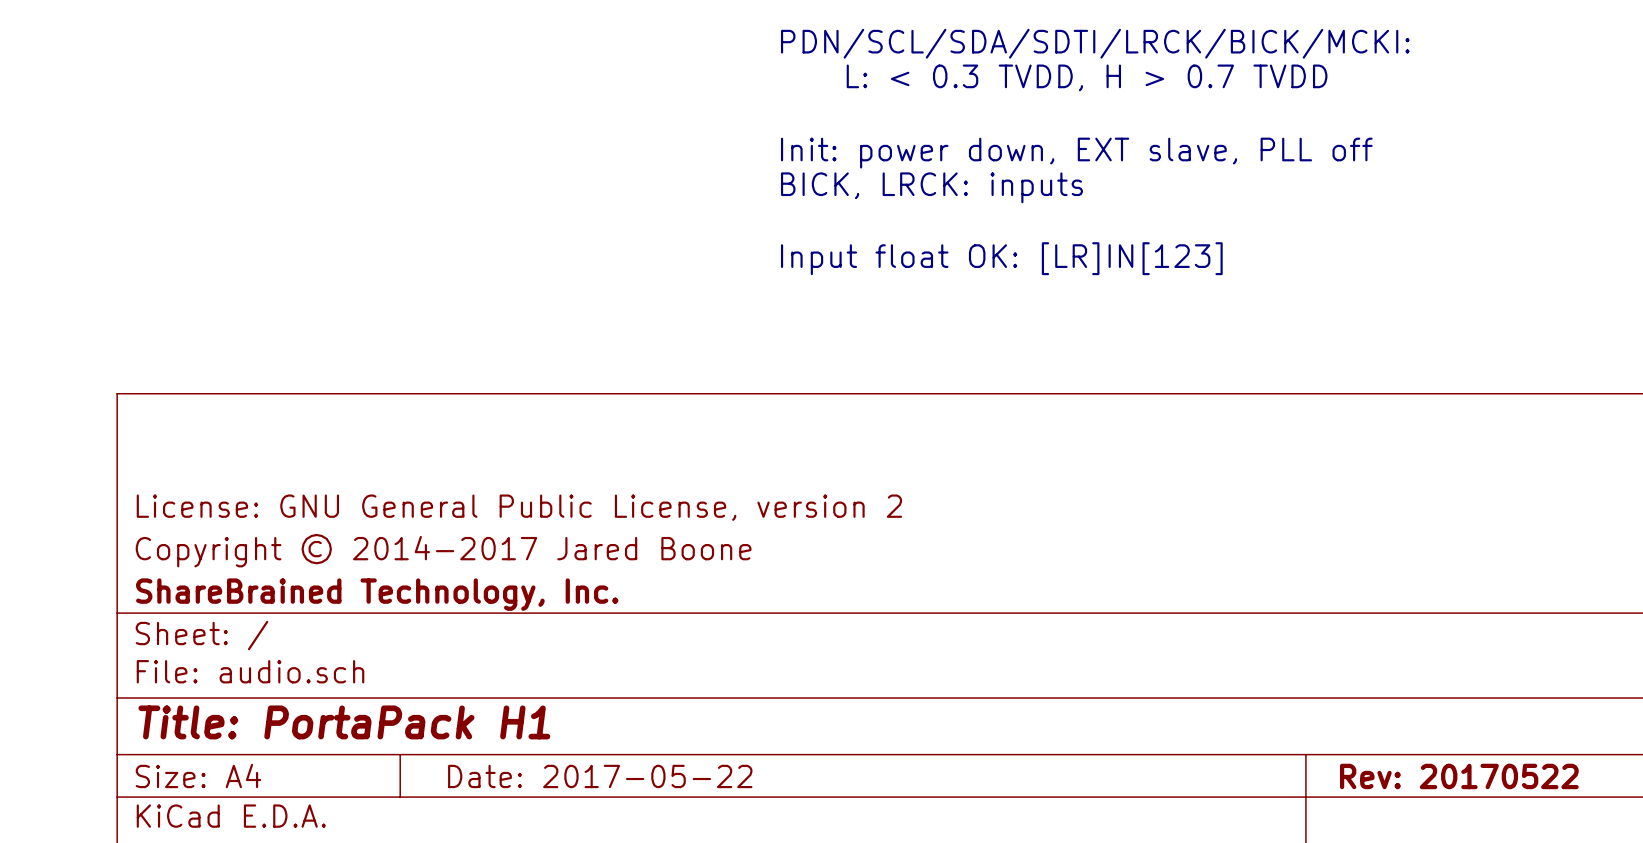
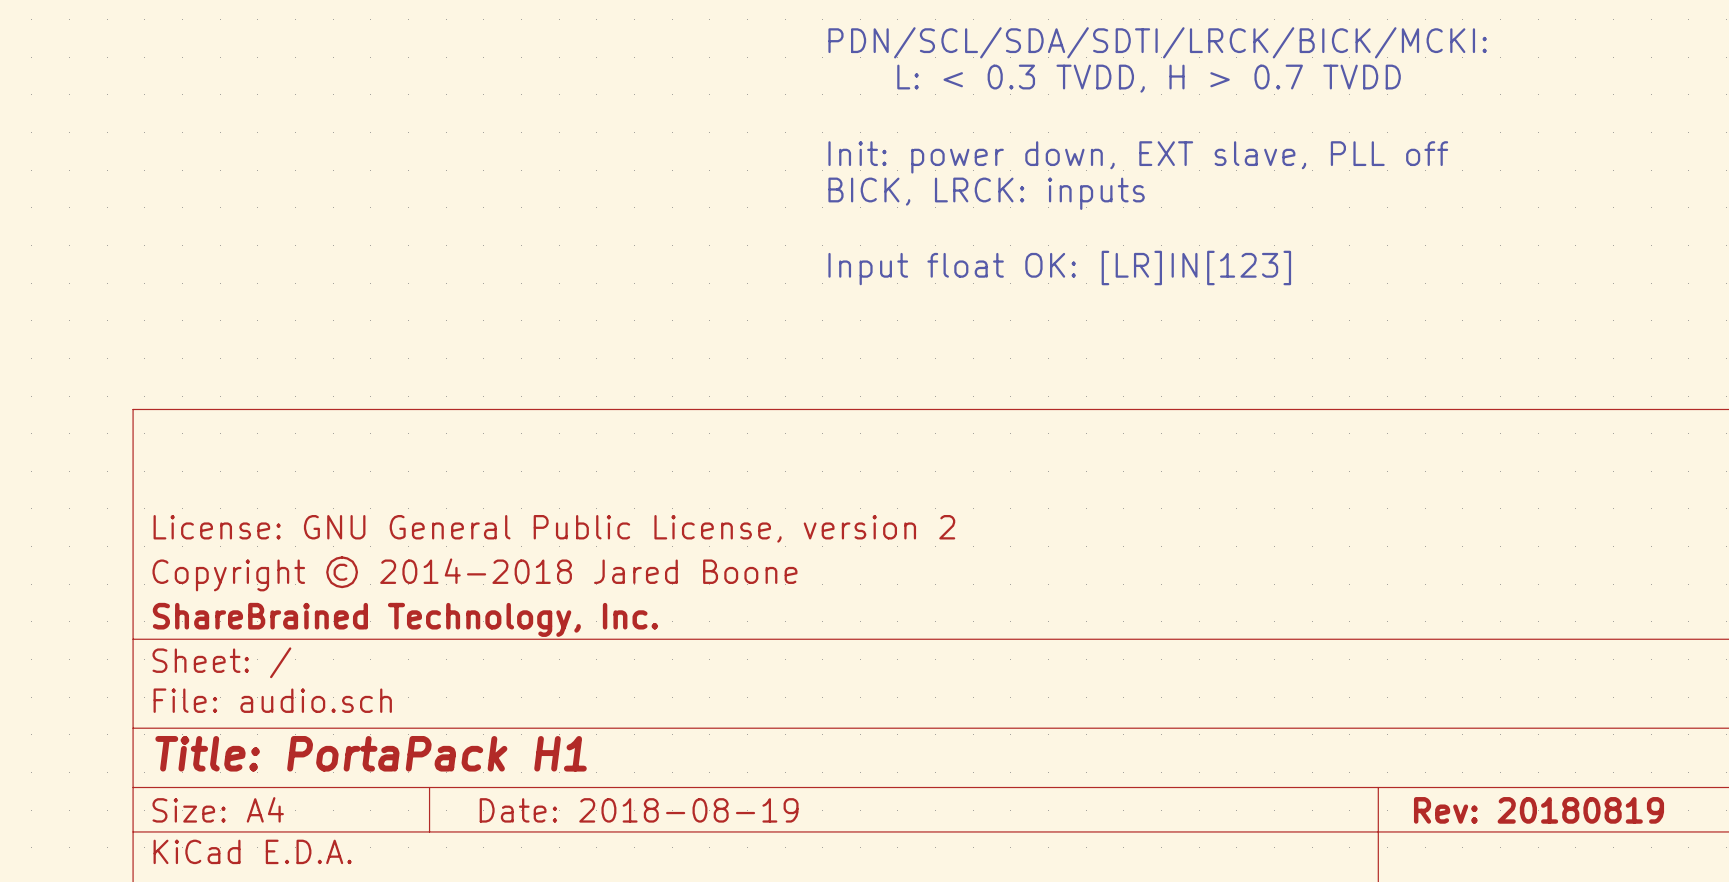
title block: Copyright © 2014-2017 Jared Boone (443, 550) -> Copyright © 2014-2018 Jared Boone (474, 573)
title block: Date: 2017-05-22 (600, 776) -> Date: 2018-08-19 (639, 810)
title block: Rev: 20170522 (1459, 776) -> Rev: 20180819 (1539, 810)

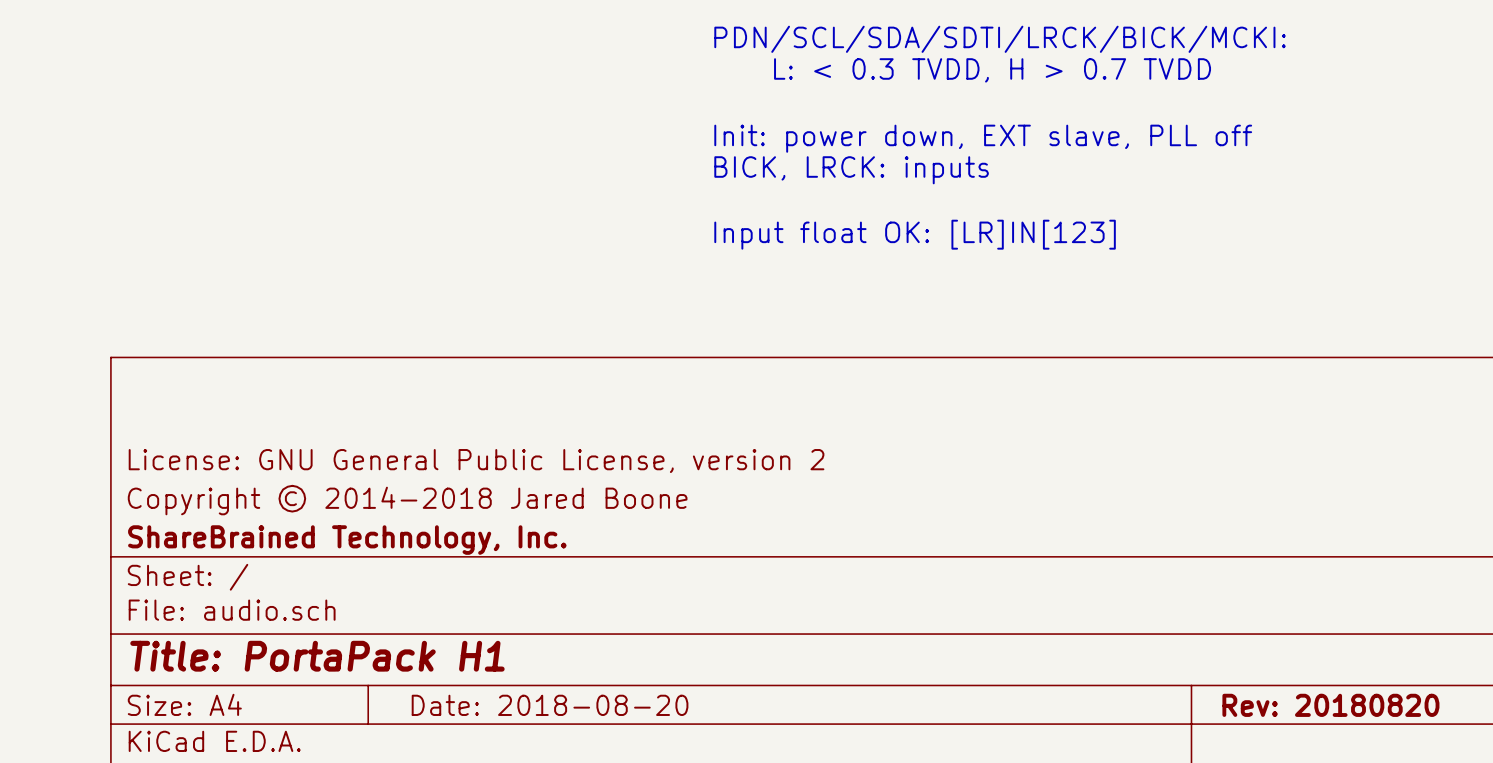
title block: Date: 2018-08-19 (639, 810) -> Date: 2018-08-20 (550, 705)
title block: Rev: 20180819 (1539, 810) -> Rev: 20180820 (1330, 705)

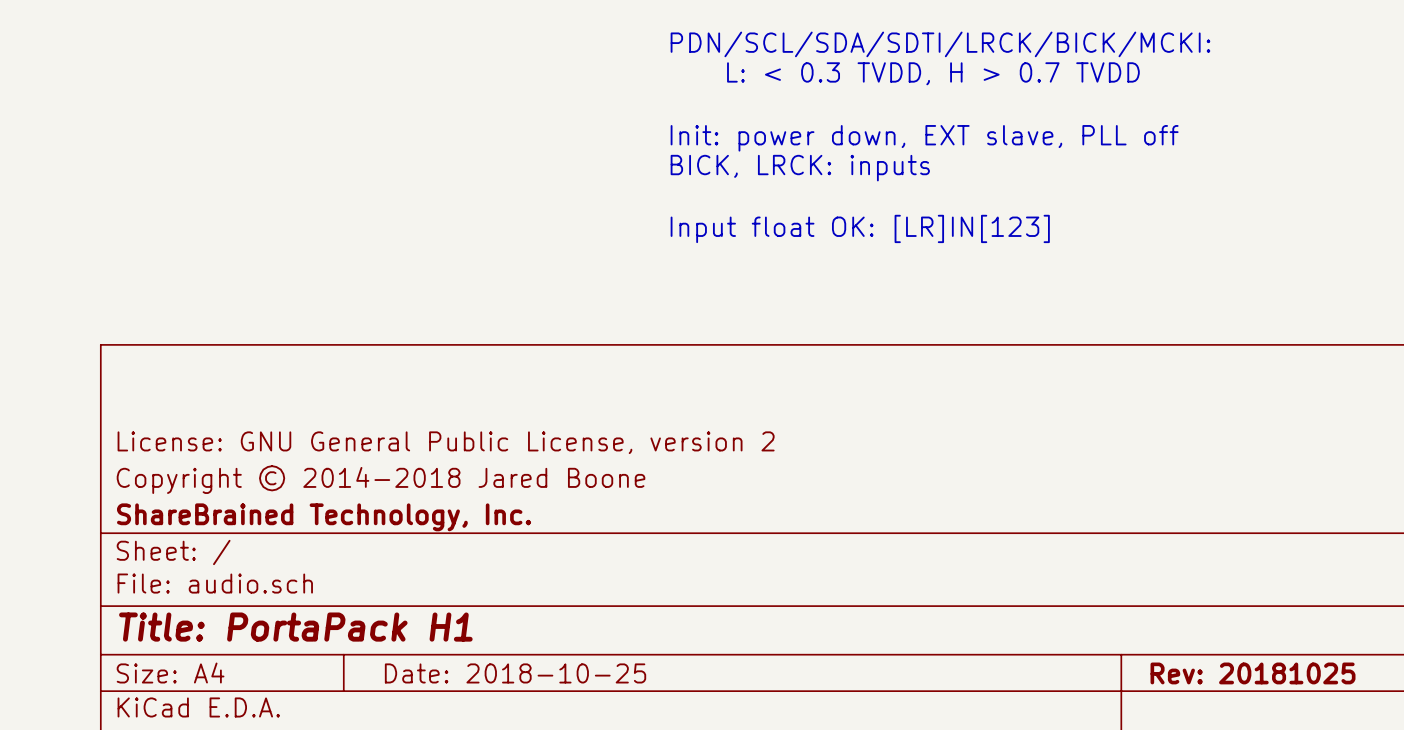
title block: Date: 2018-08-20 (550, 705) -> Date: 2018-10-25 (515, 673)
title block: Rev: 20180820 (1330, 705) -> Rev: 20181025 (1253, 673)

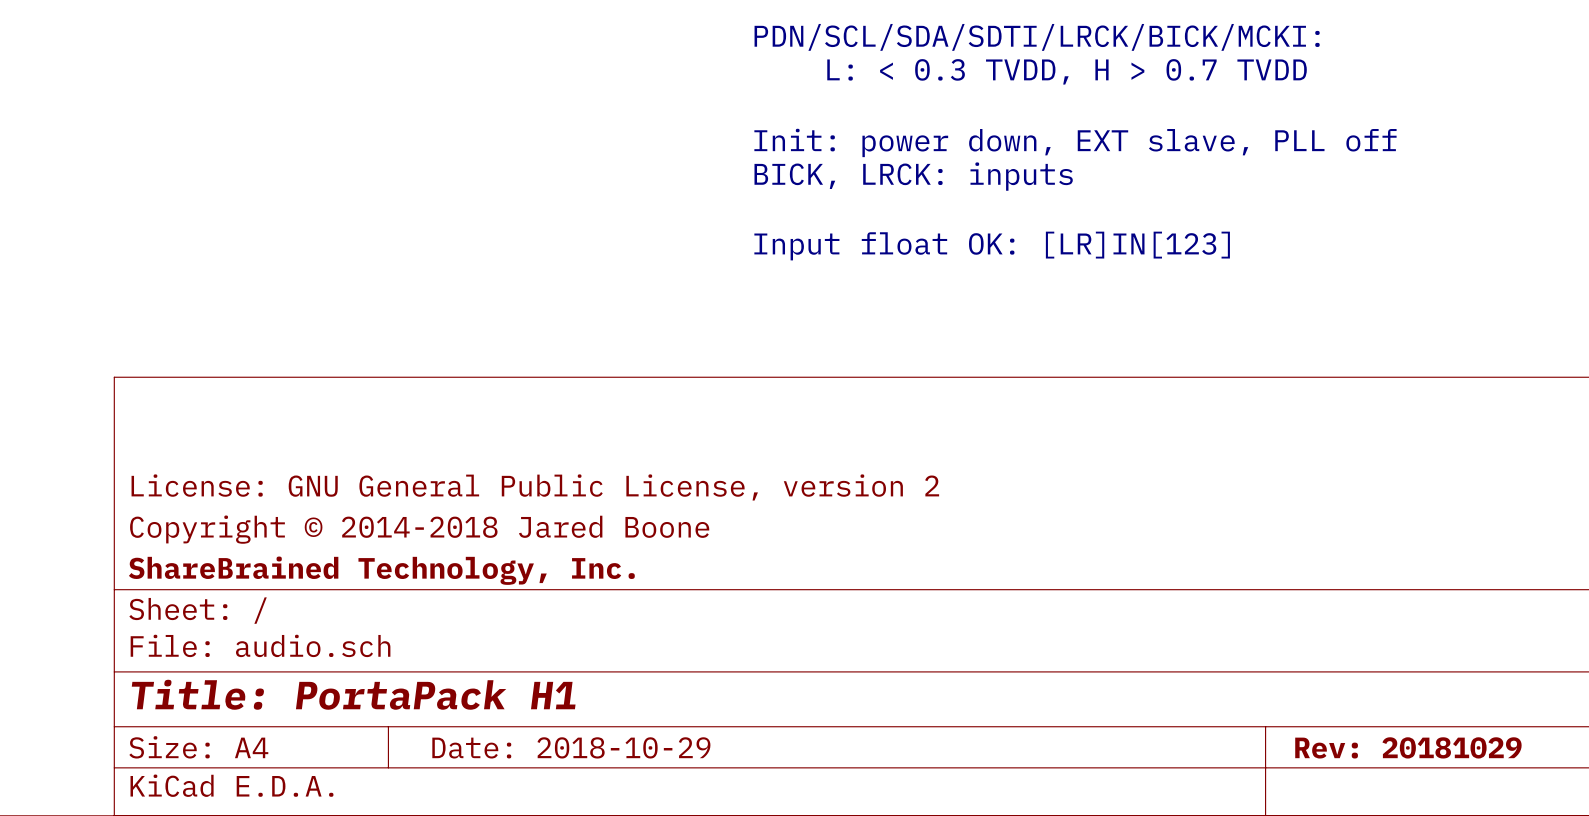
title block: Date: 2018-10-25 (515, 673) -> Date: 2018-10-29 (571, 747)
title block: Rev: 20181025 (1253, 673) -> Rev: 20181029 (1408, 747)

